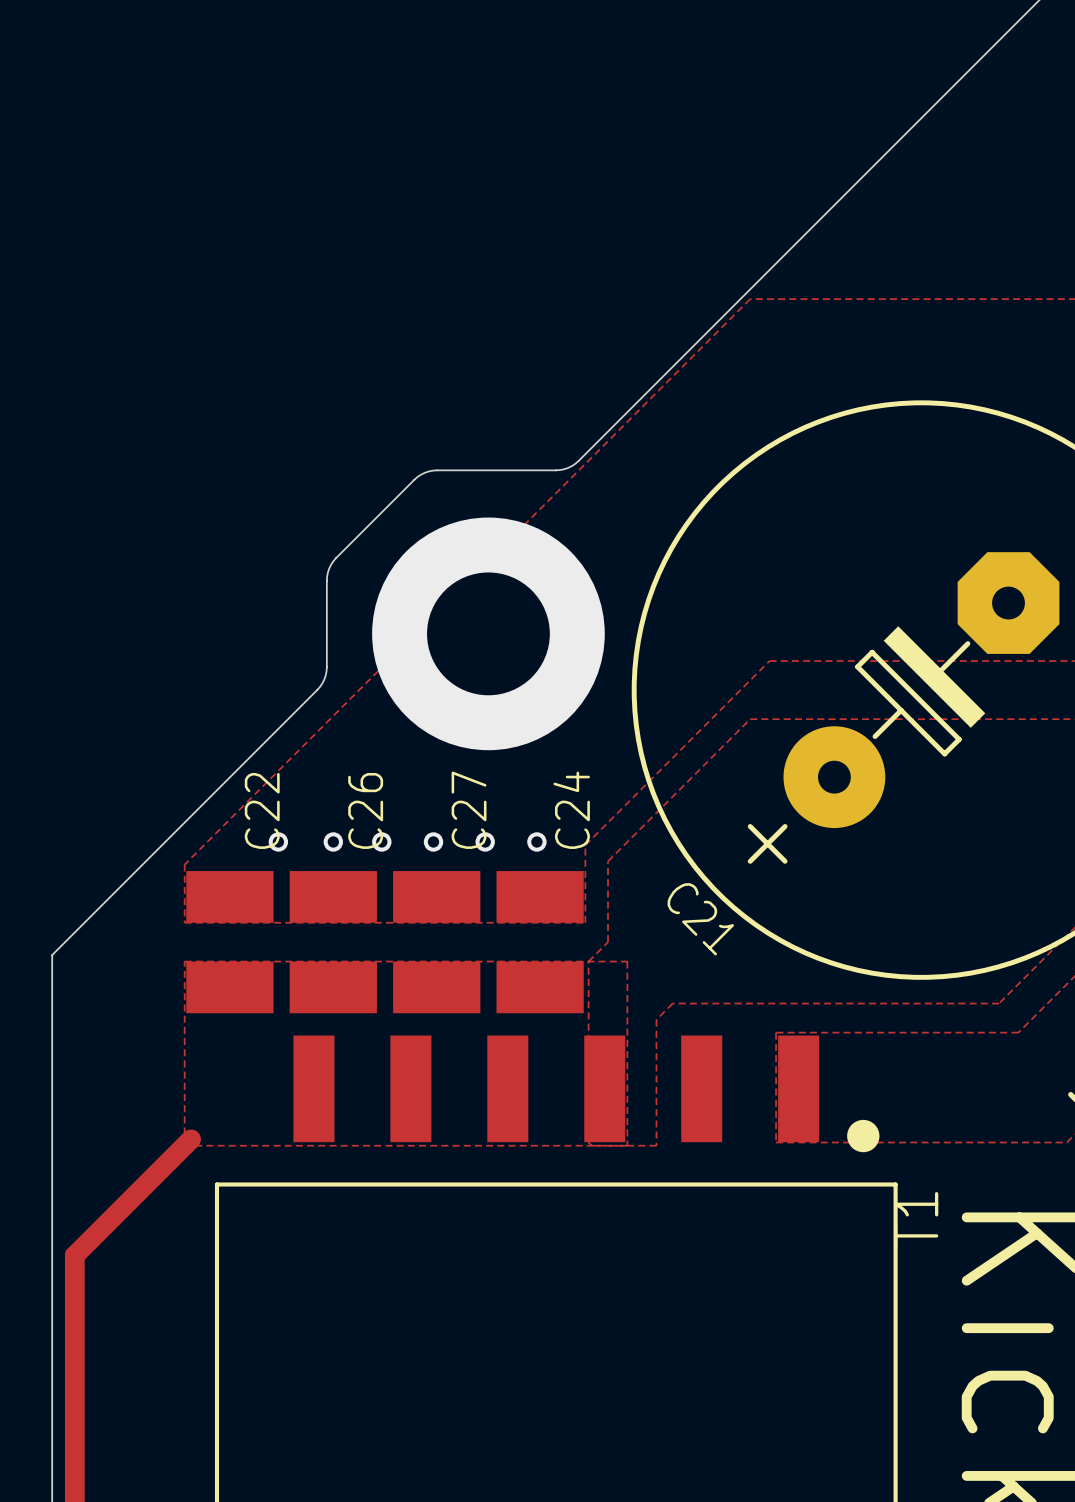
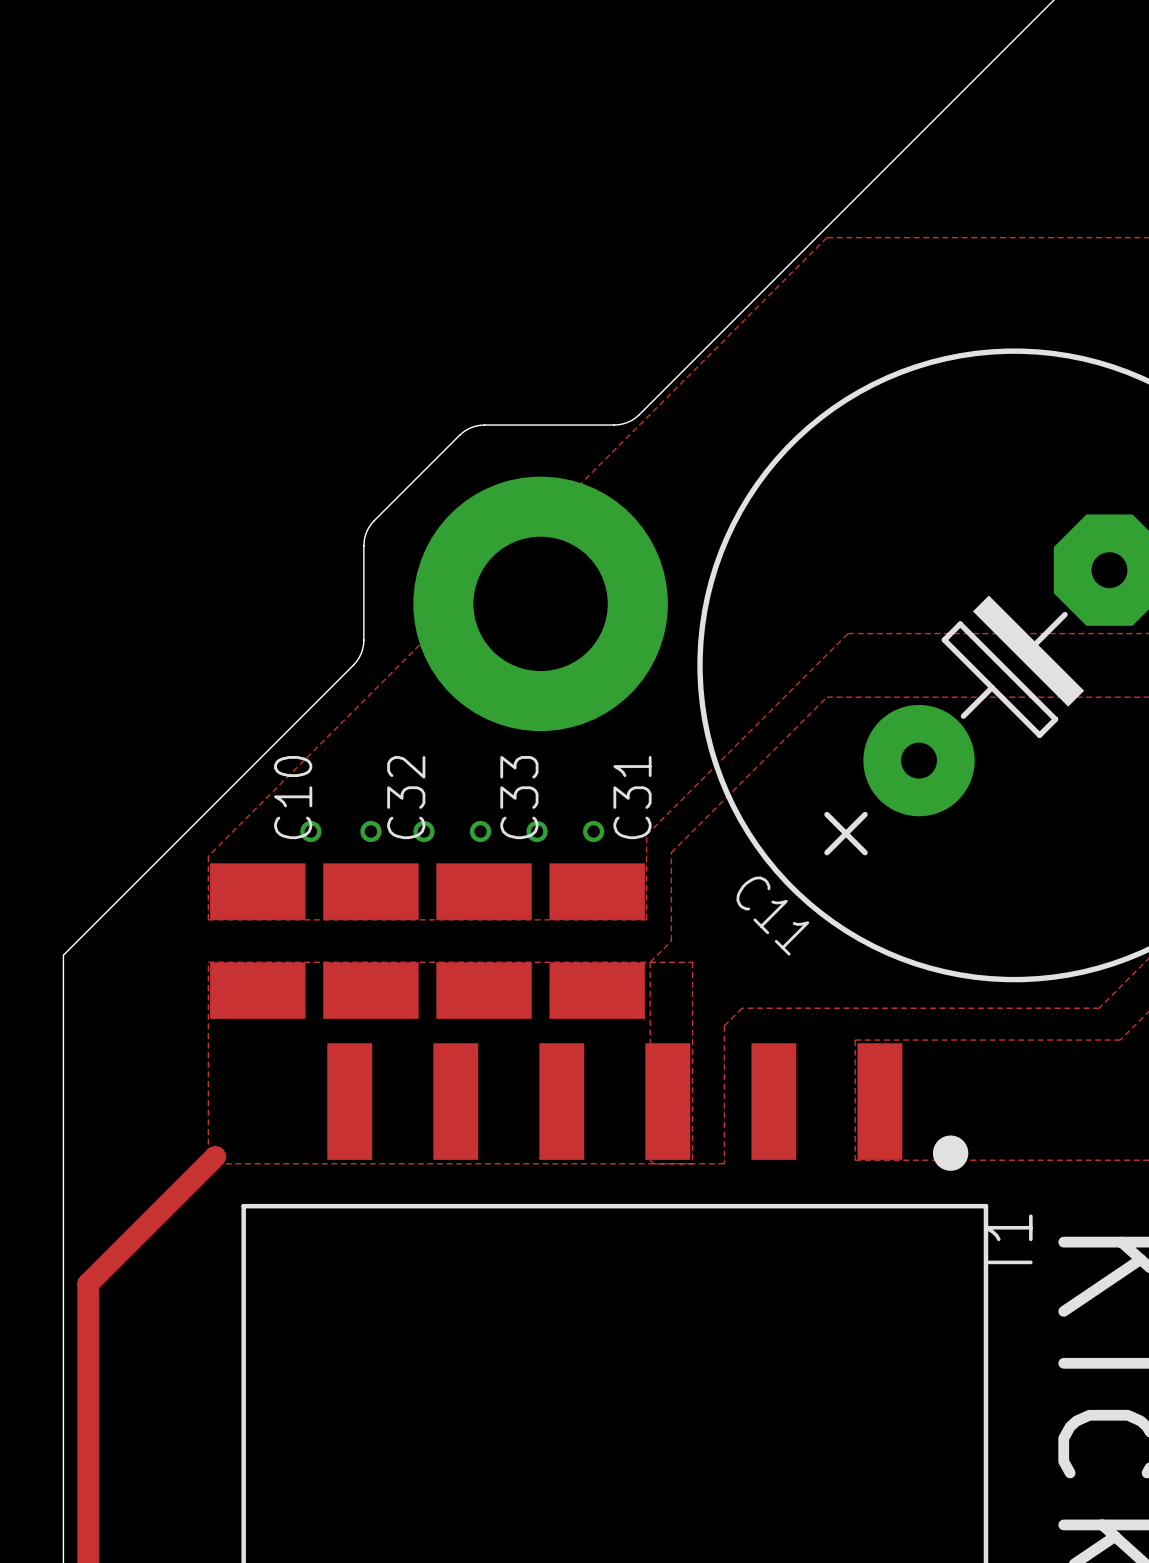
C22 name: C22 (262, 810) -> C10 (293, 797)
C26 name: C26 (365, 810) -> C32 (406, 797)
C27 name: C27 (469, 810) -> C33 (519, 797)
C24 name: C24 (571, 810) -> C31 (632, 797)
C21 name: C21 (700, 919) -> C11 (772, 916)

